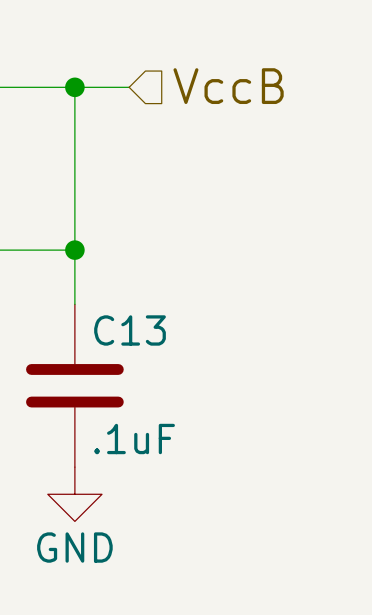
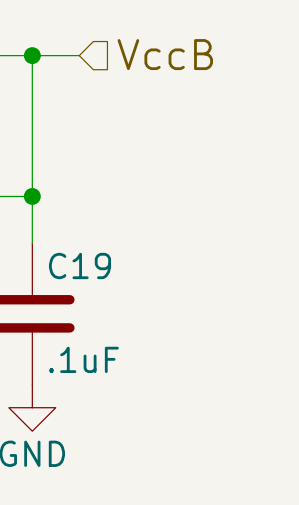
C13 name: C13 (130, 330) -> C19 (80, 266)

